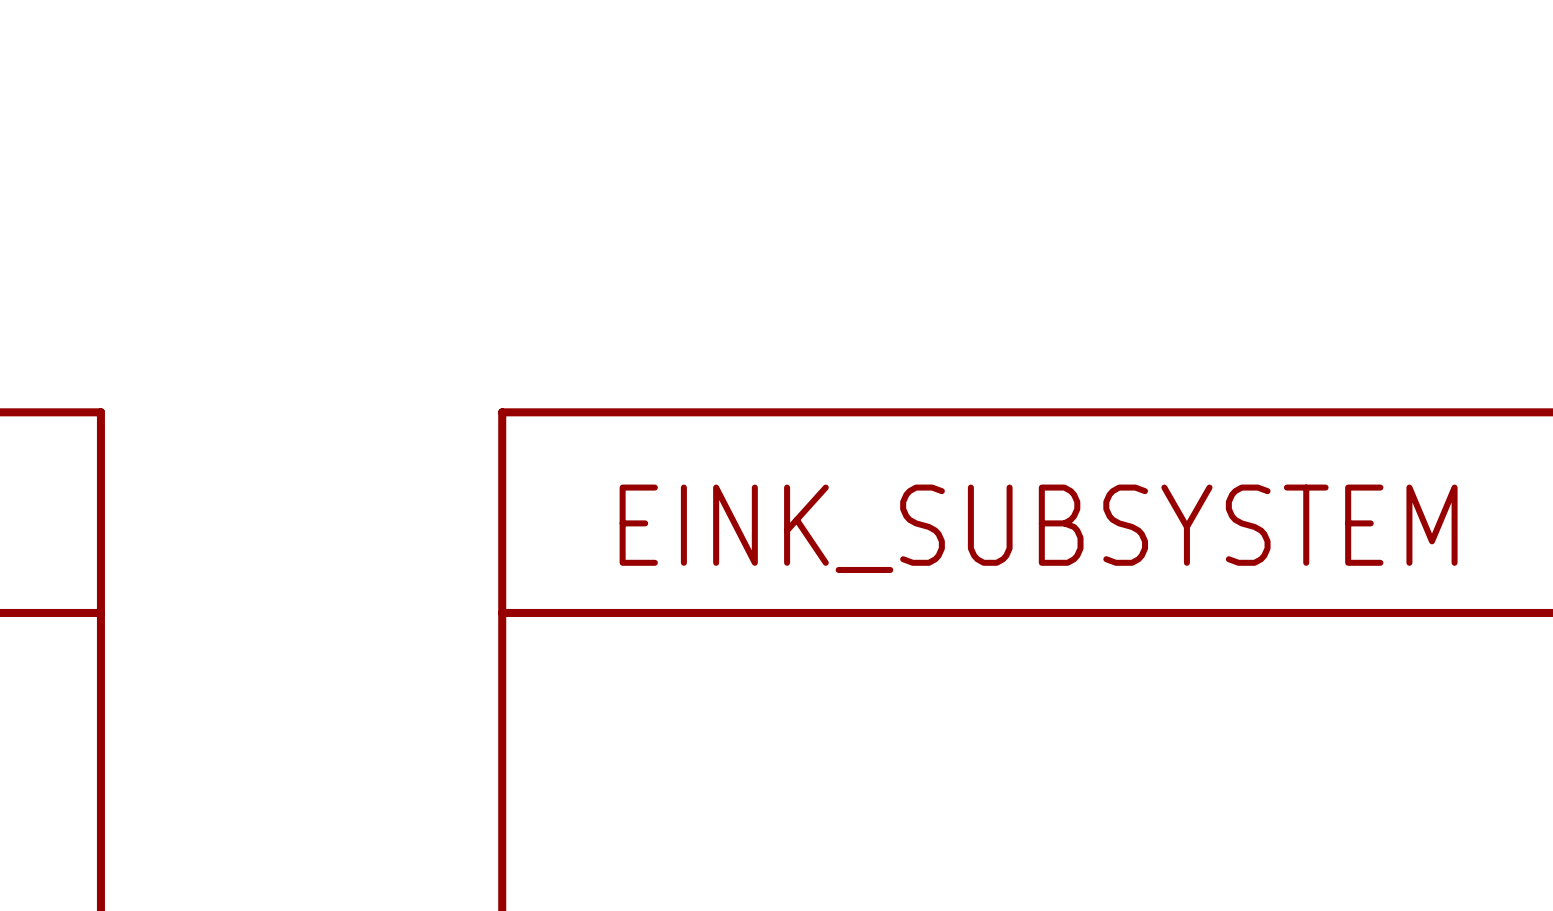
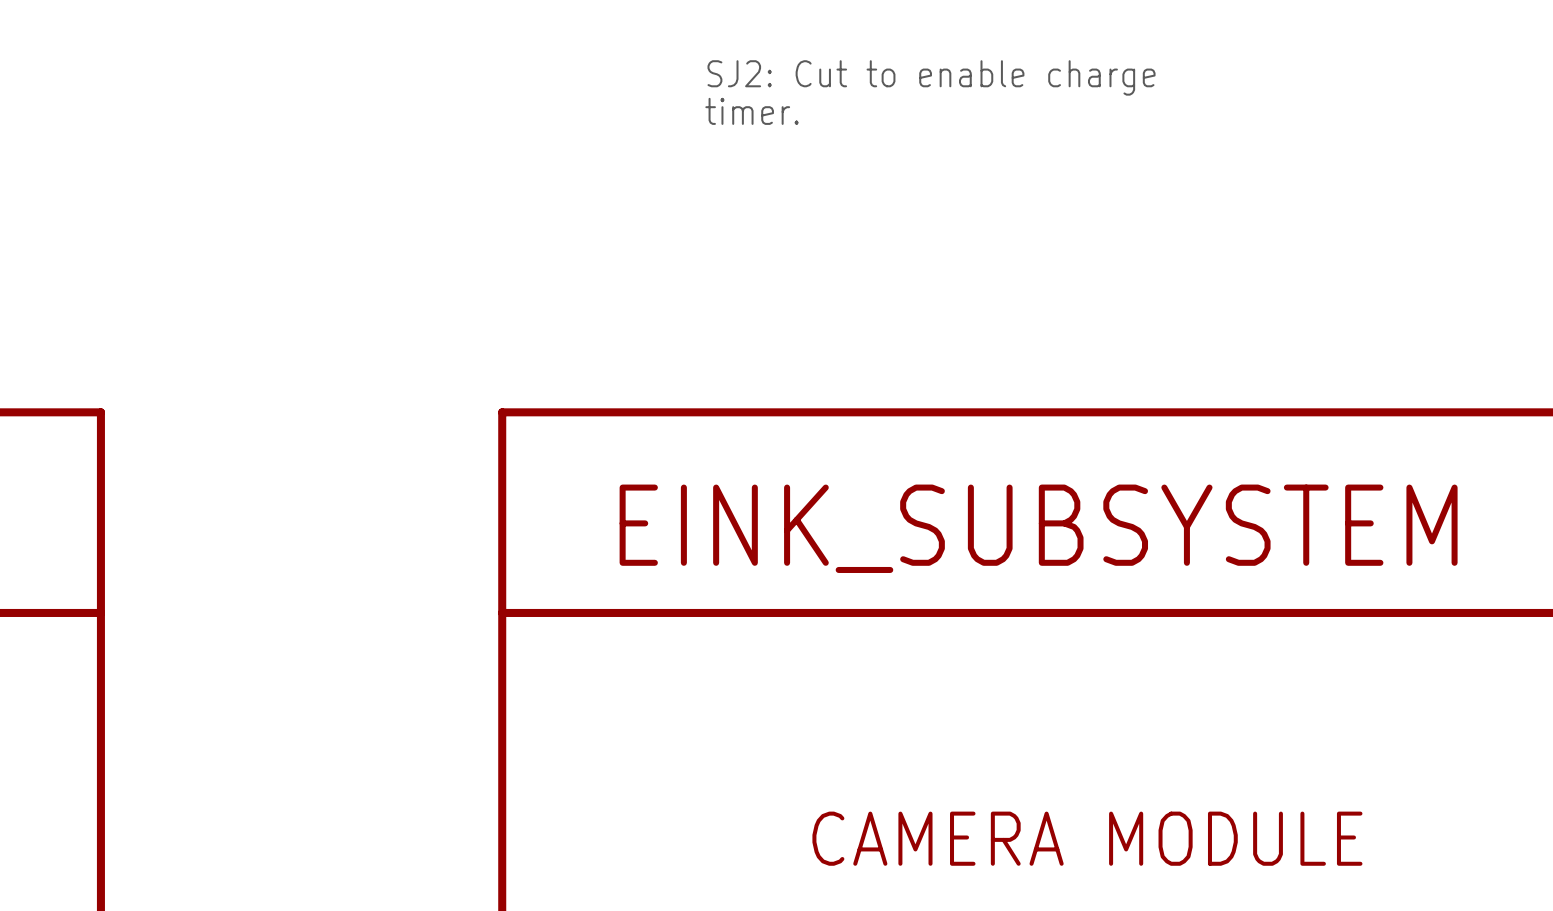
text: none -> SJ2: Cut to enable charge (931, 77)
text: none -> timer. (752, 111)
text: none -> CAMERA MODULE (1087, 838)

